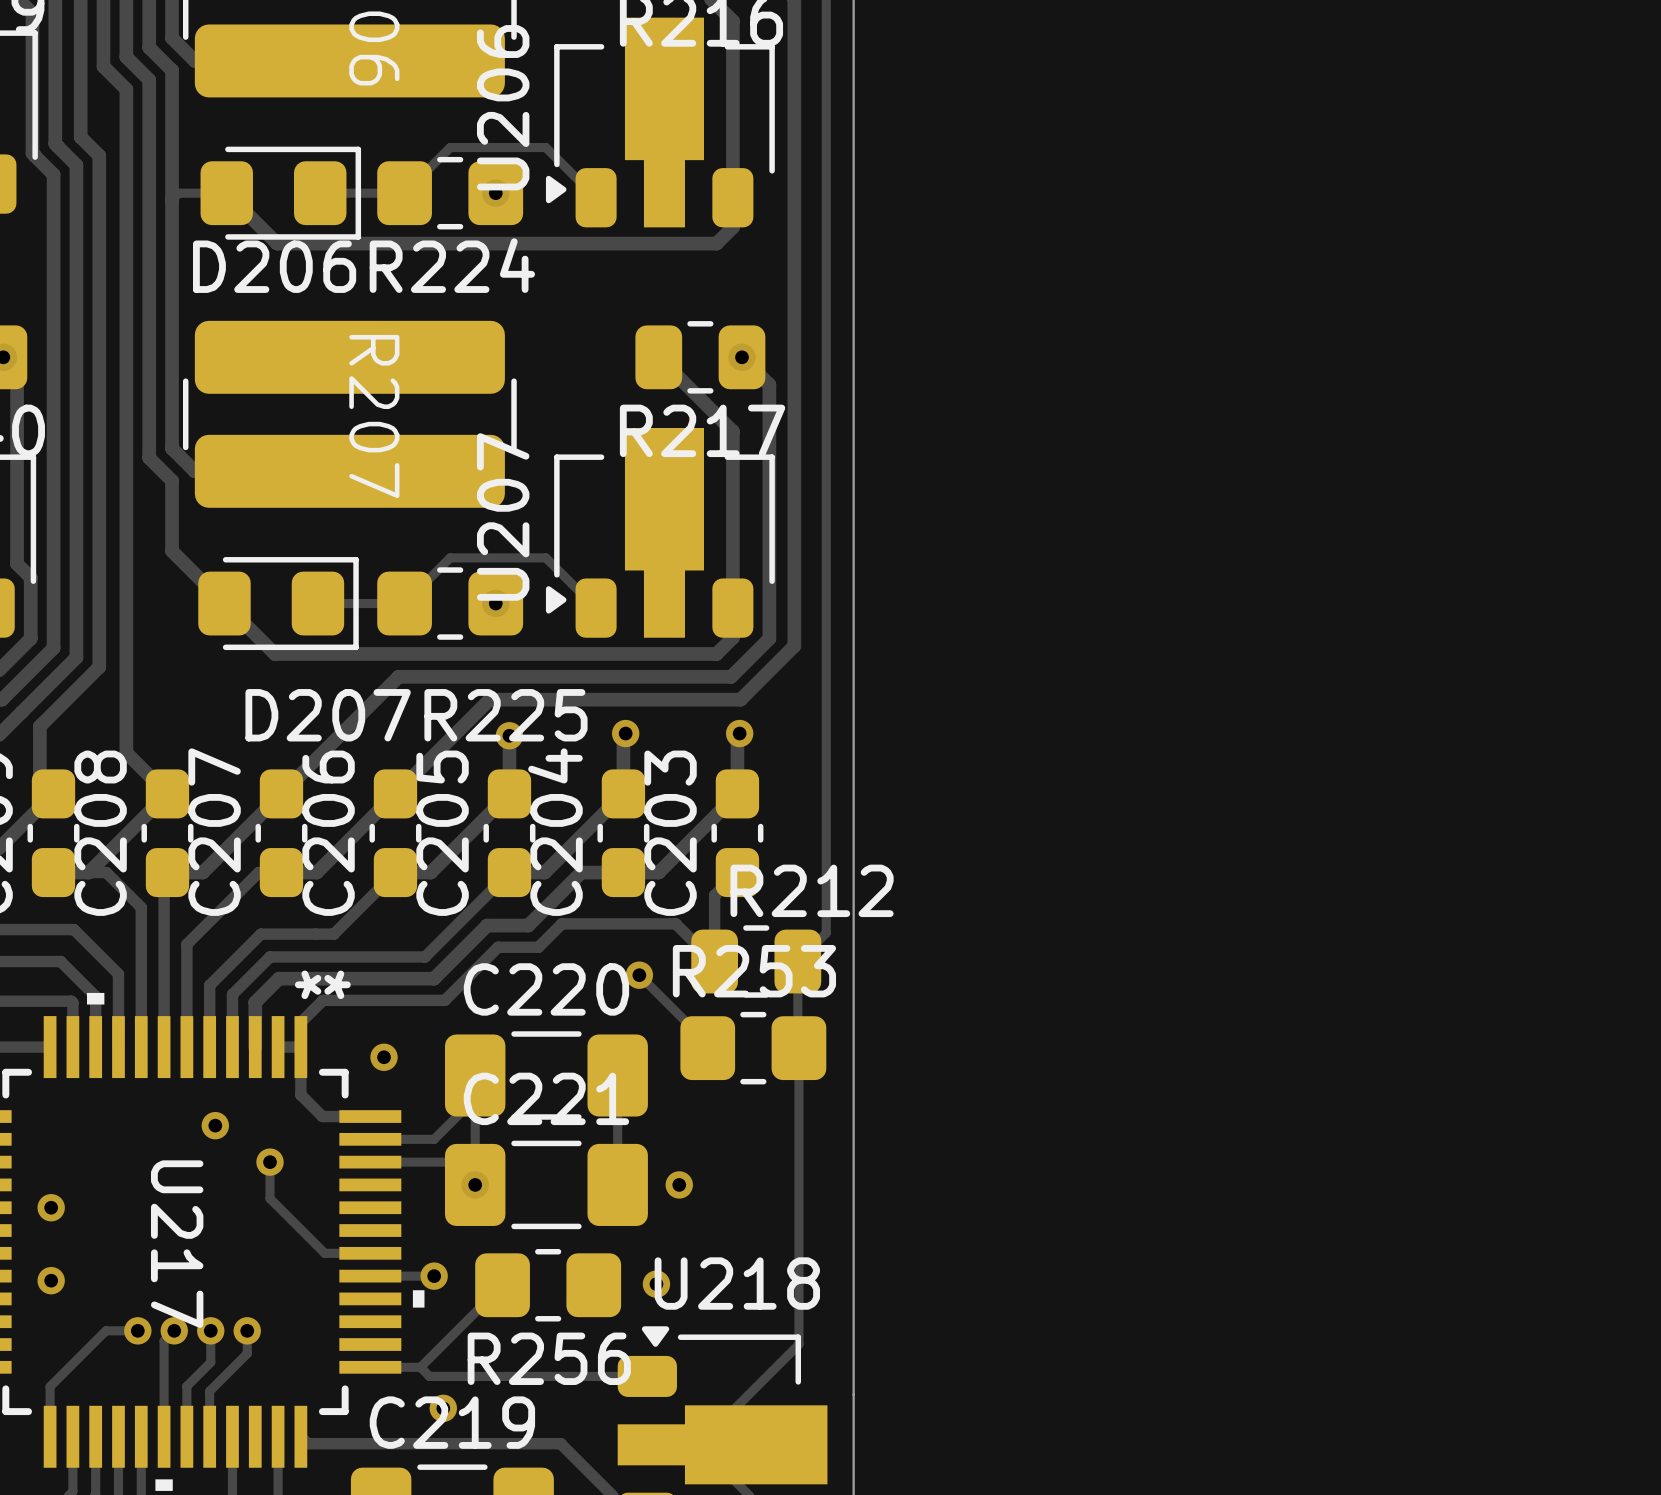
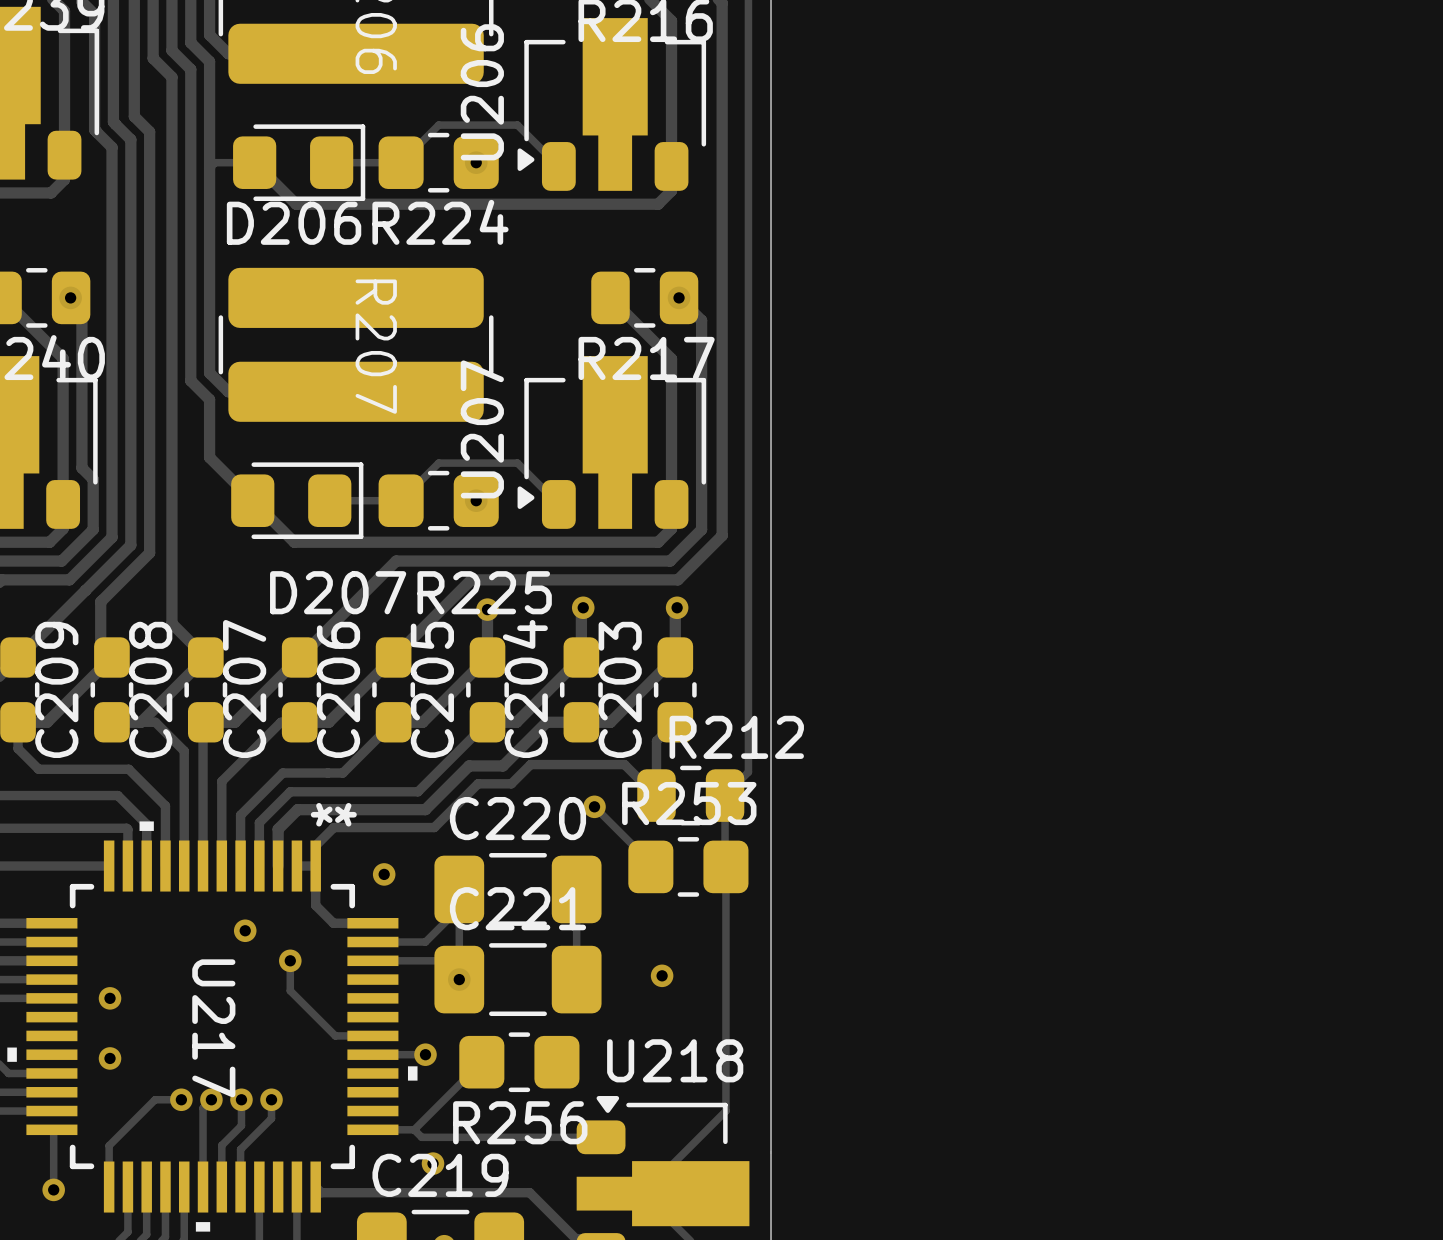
via position: (679, 1184) -> (662, 975)
via: (656, 1284) -> none

